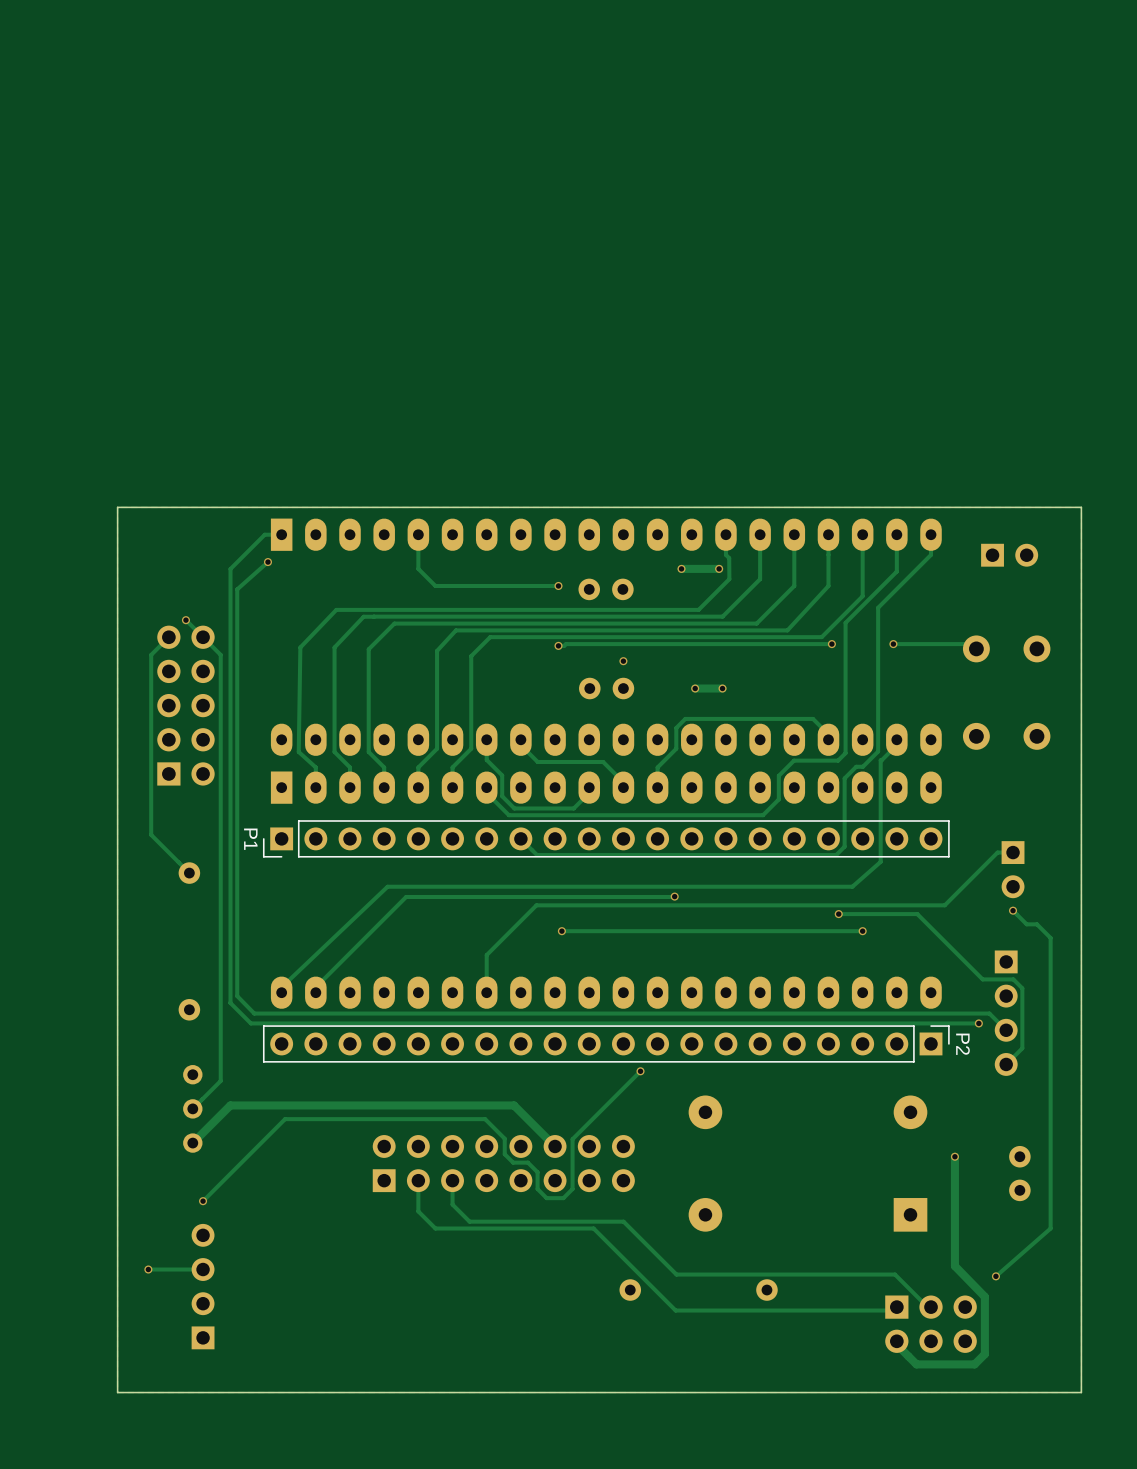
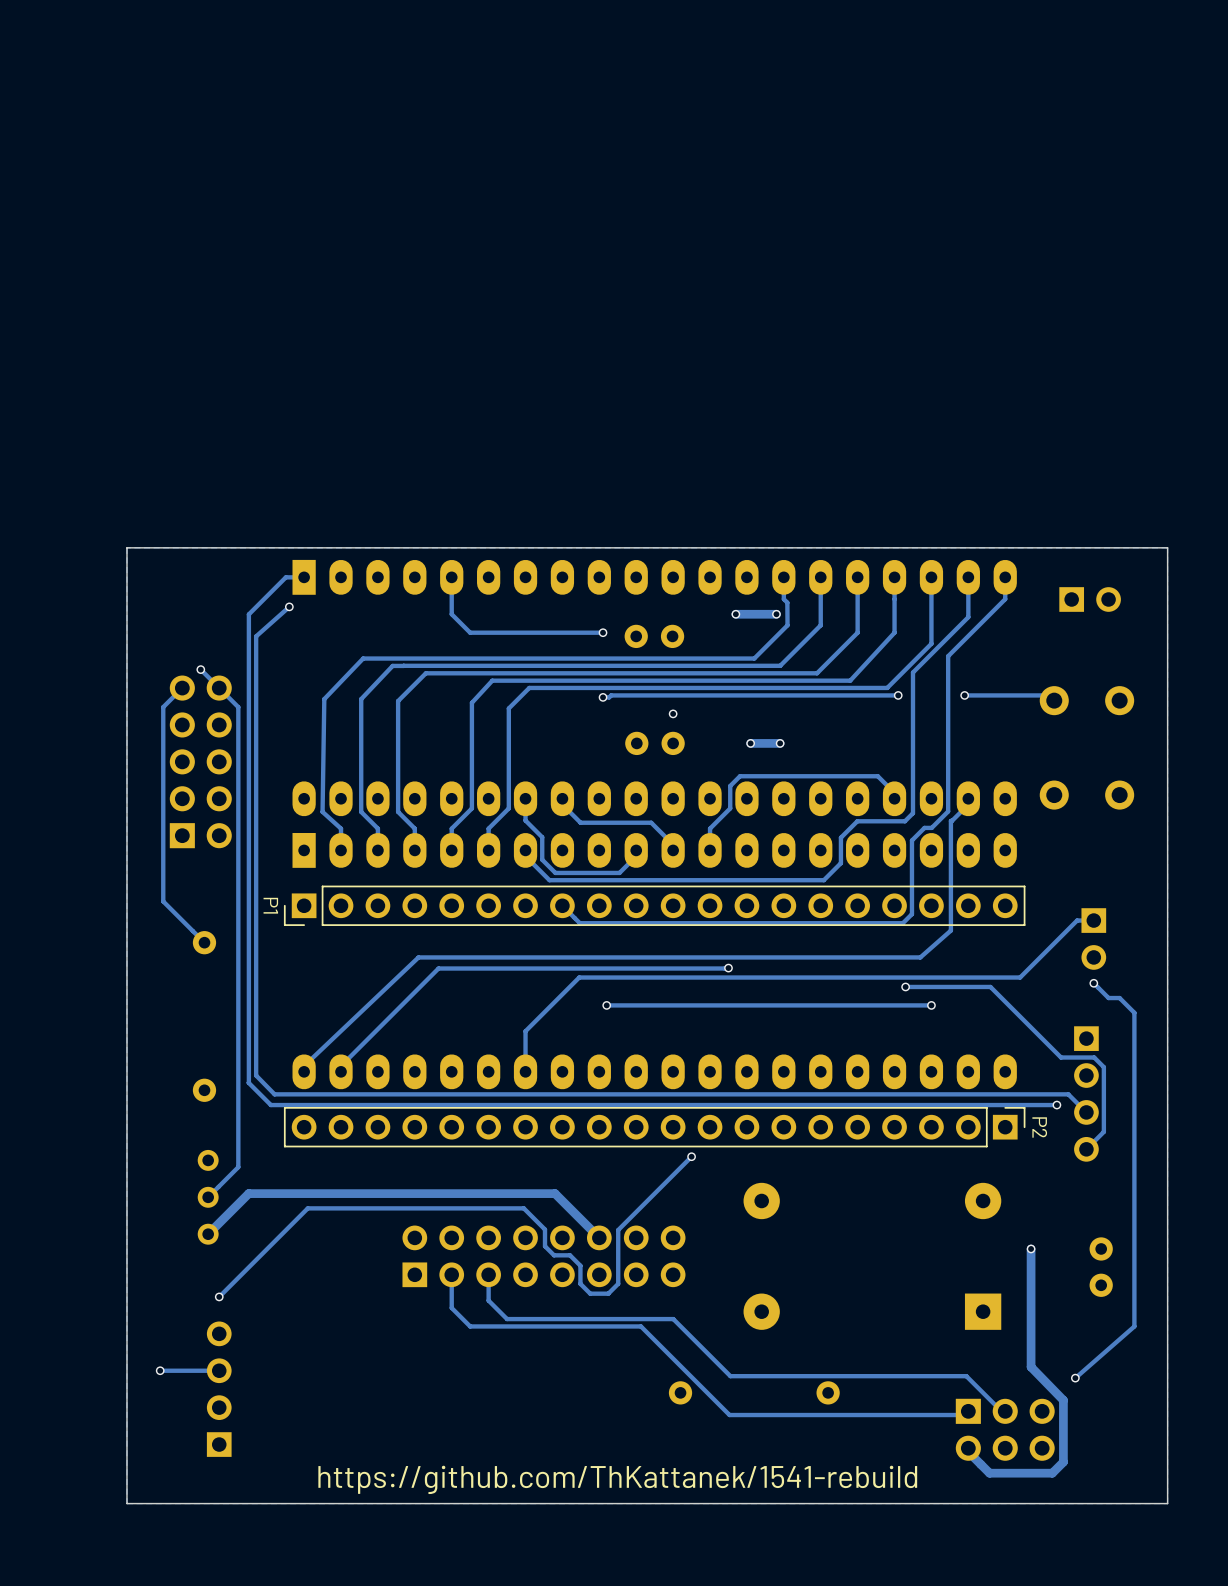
text: none -> https://github.com/ThKattanek/1541-rebuild (617, 1479)

